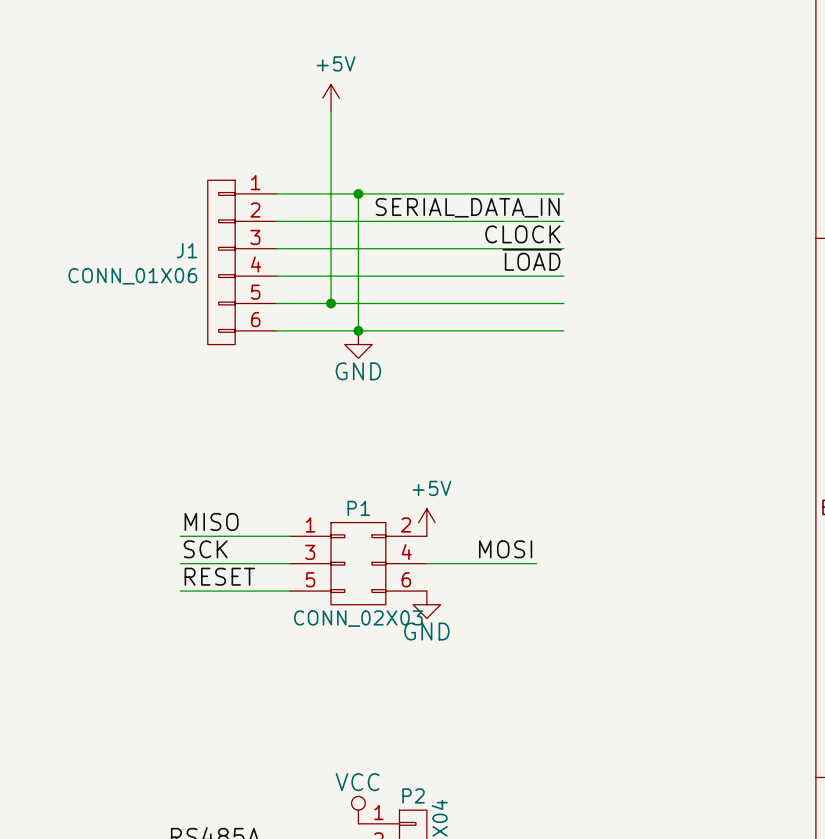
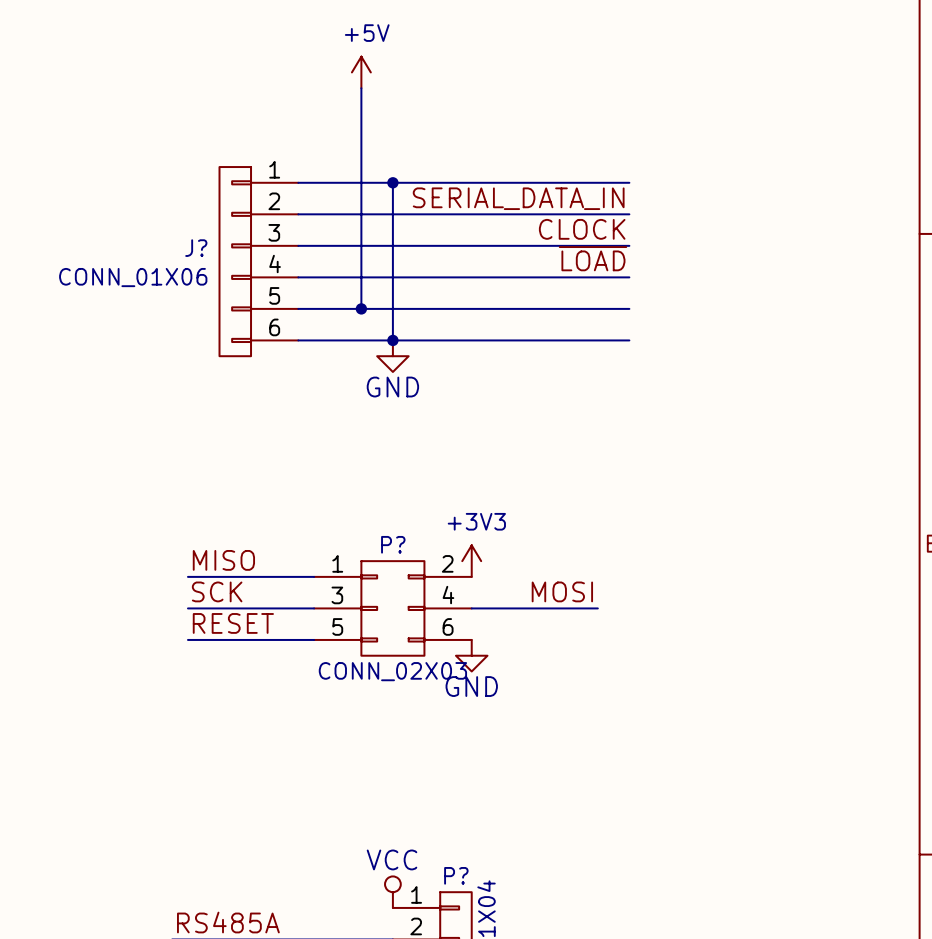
J1 name: J1 (186, 250) -> J? (196, 248)
P1 name: P1 (358, 508) -> P? (393, 544)
power symbol: +5V (426, 522) -> +3V3 (471, 561)
P2 name: P2 (413, 795) -> P? (456, 875)

